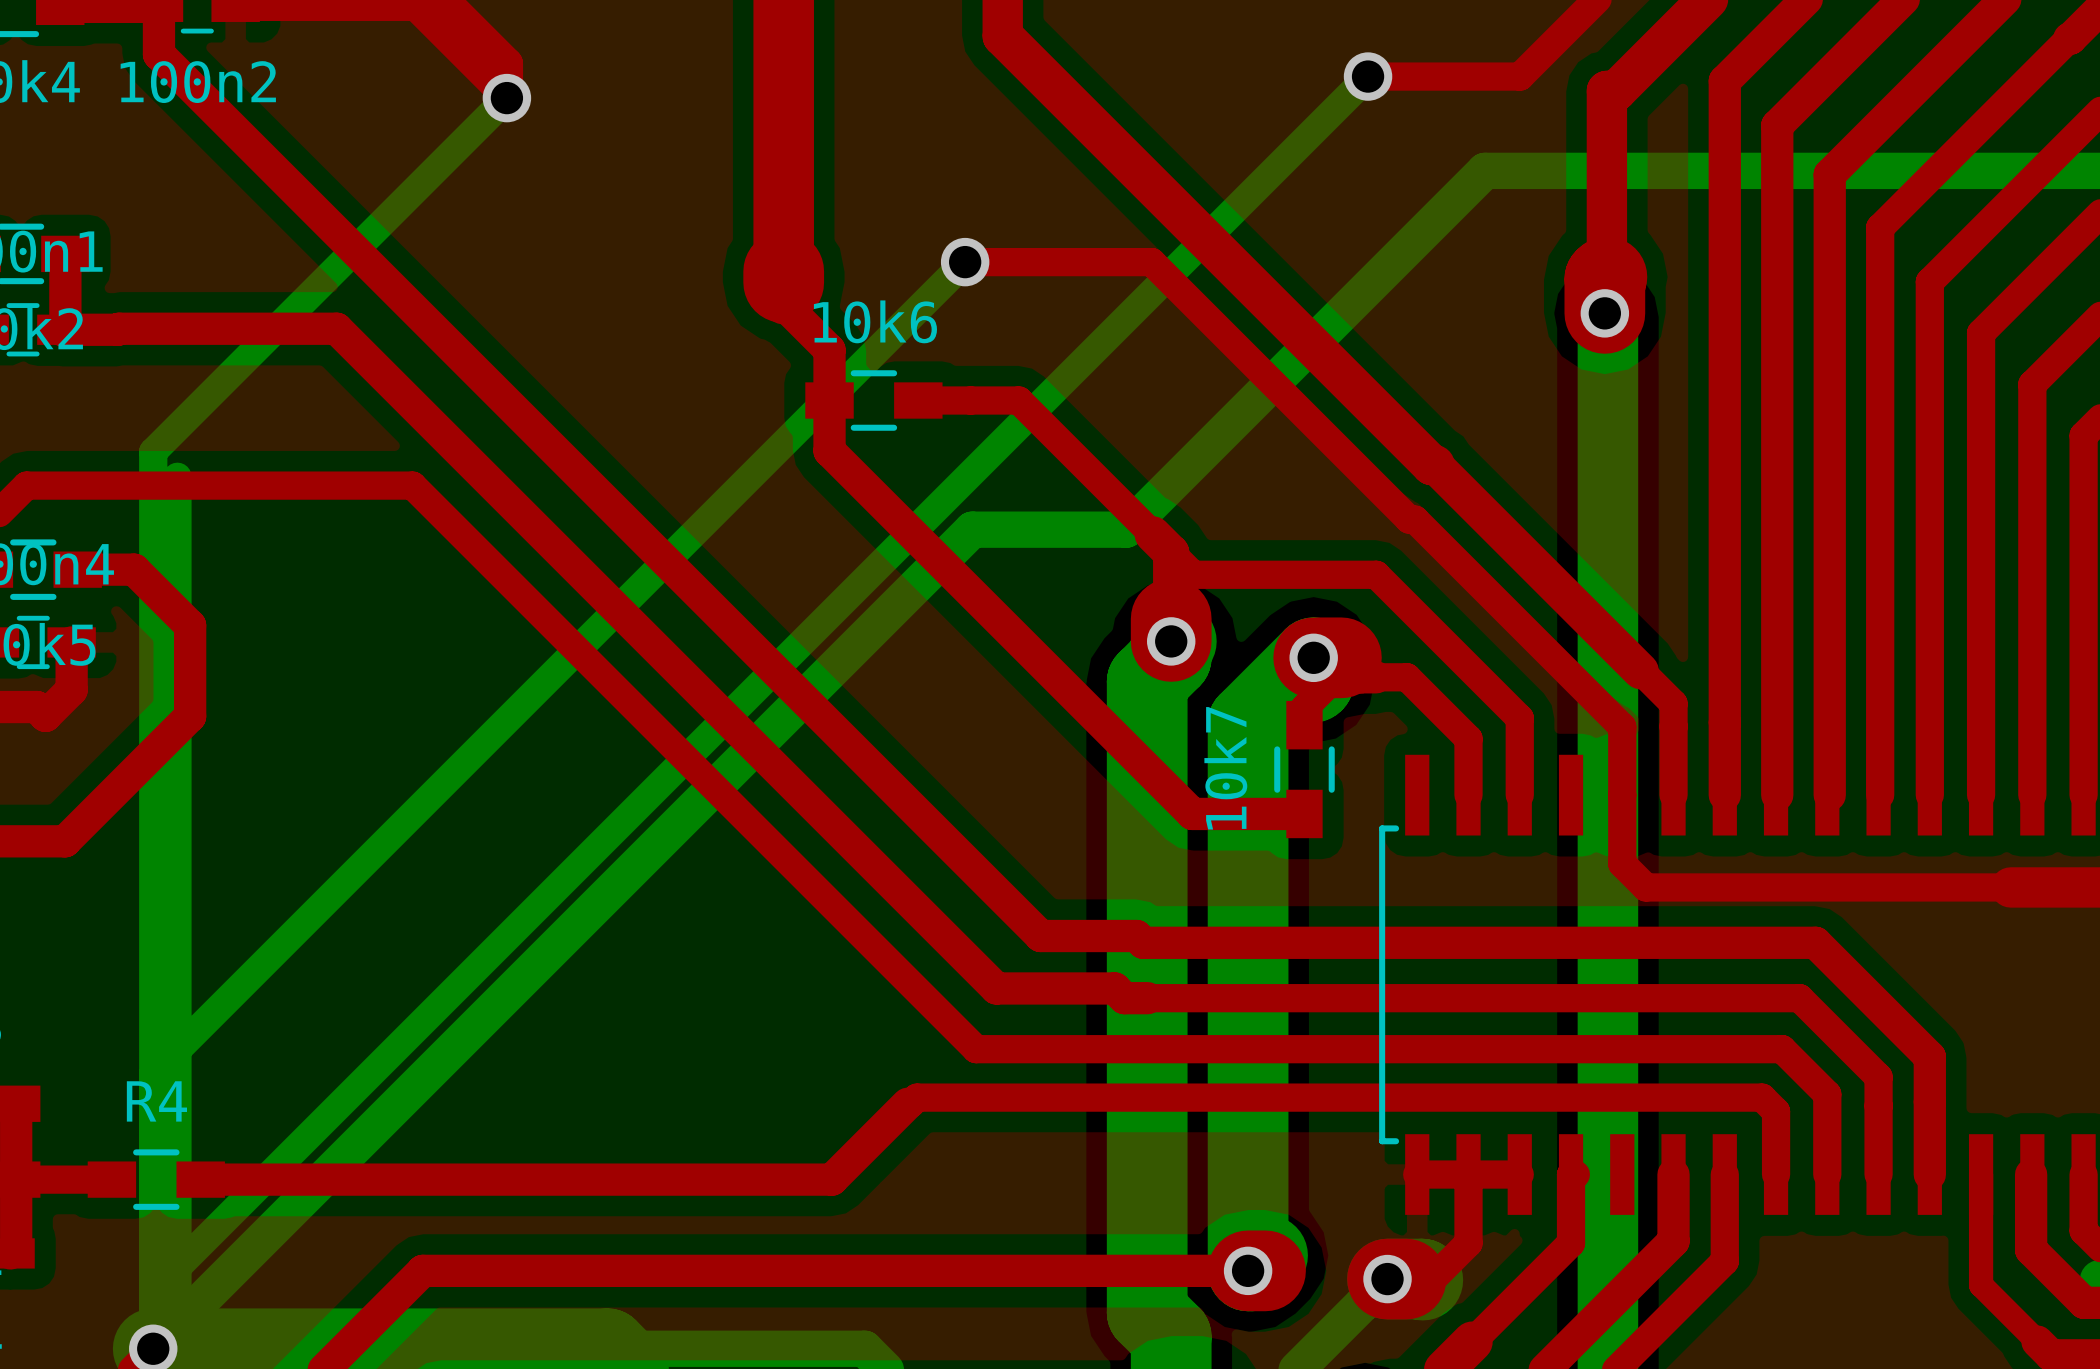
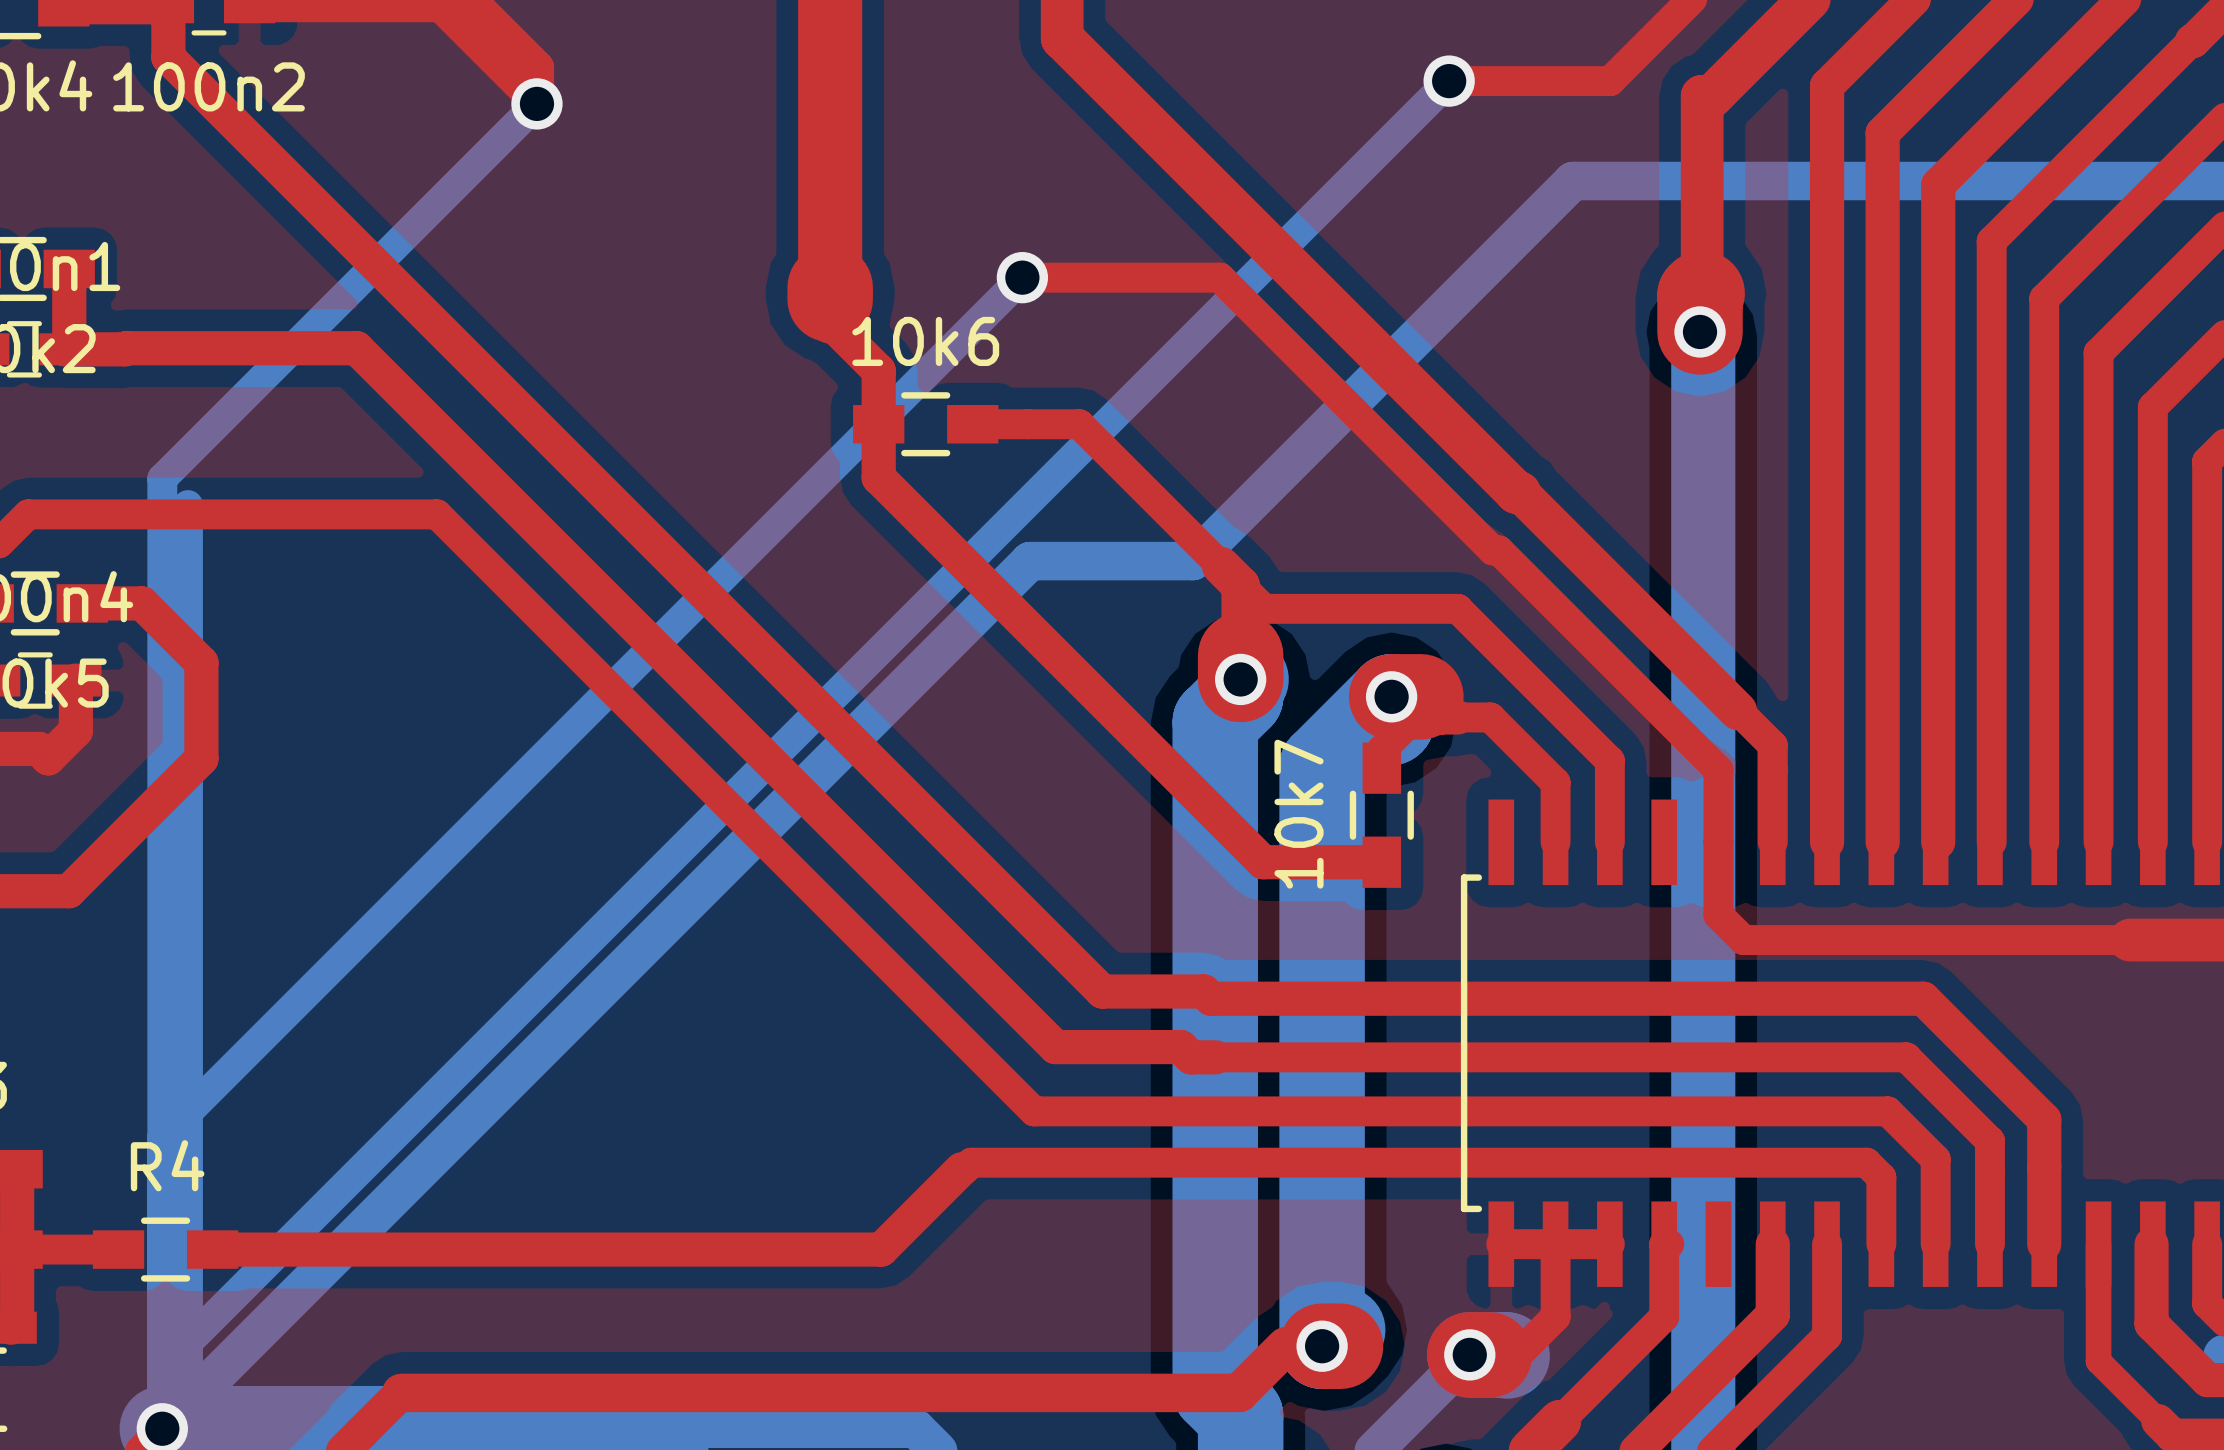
top track: (1213, 1270) (422, 1270) (378, 1314) -> (1285, 1346) (1239, 1392) (401, 1392)

